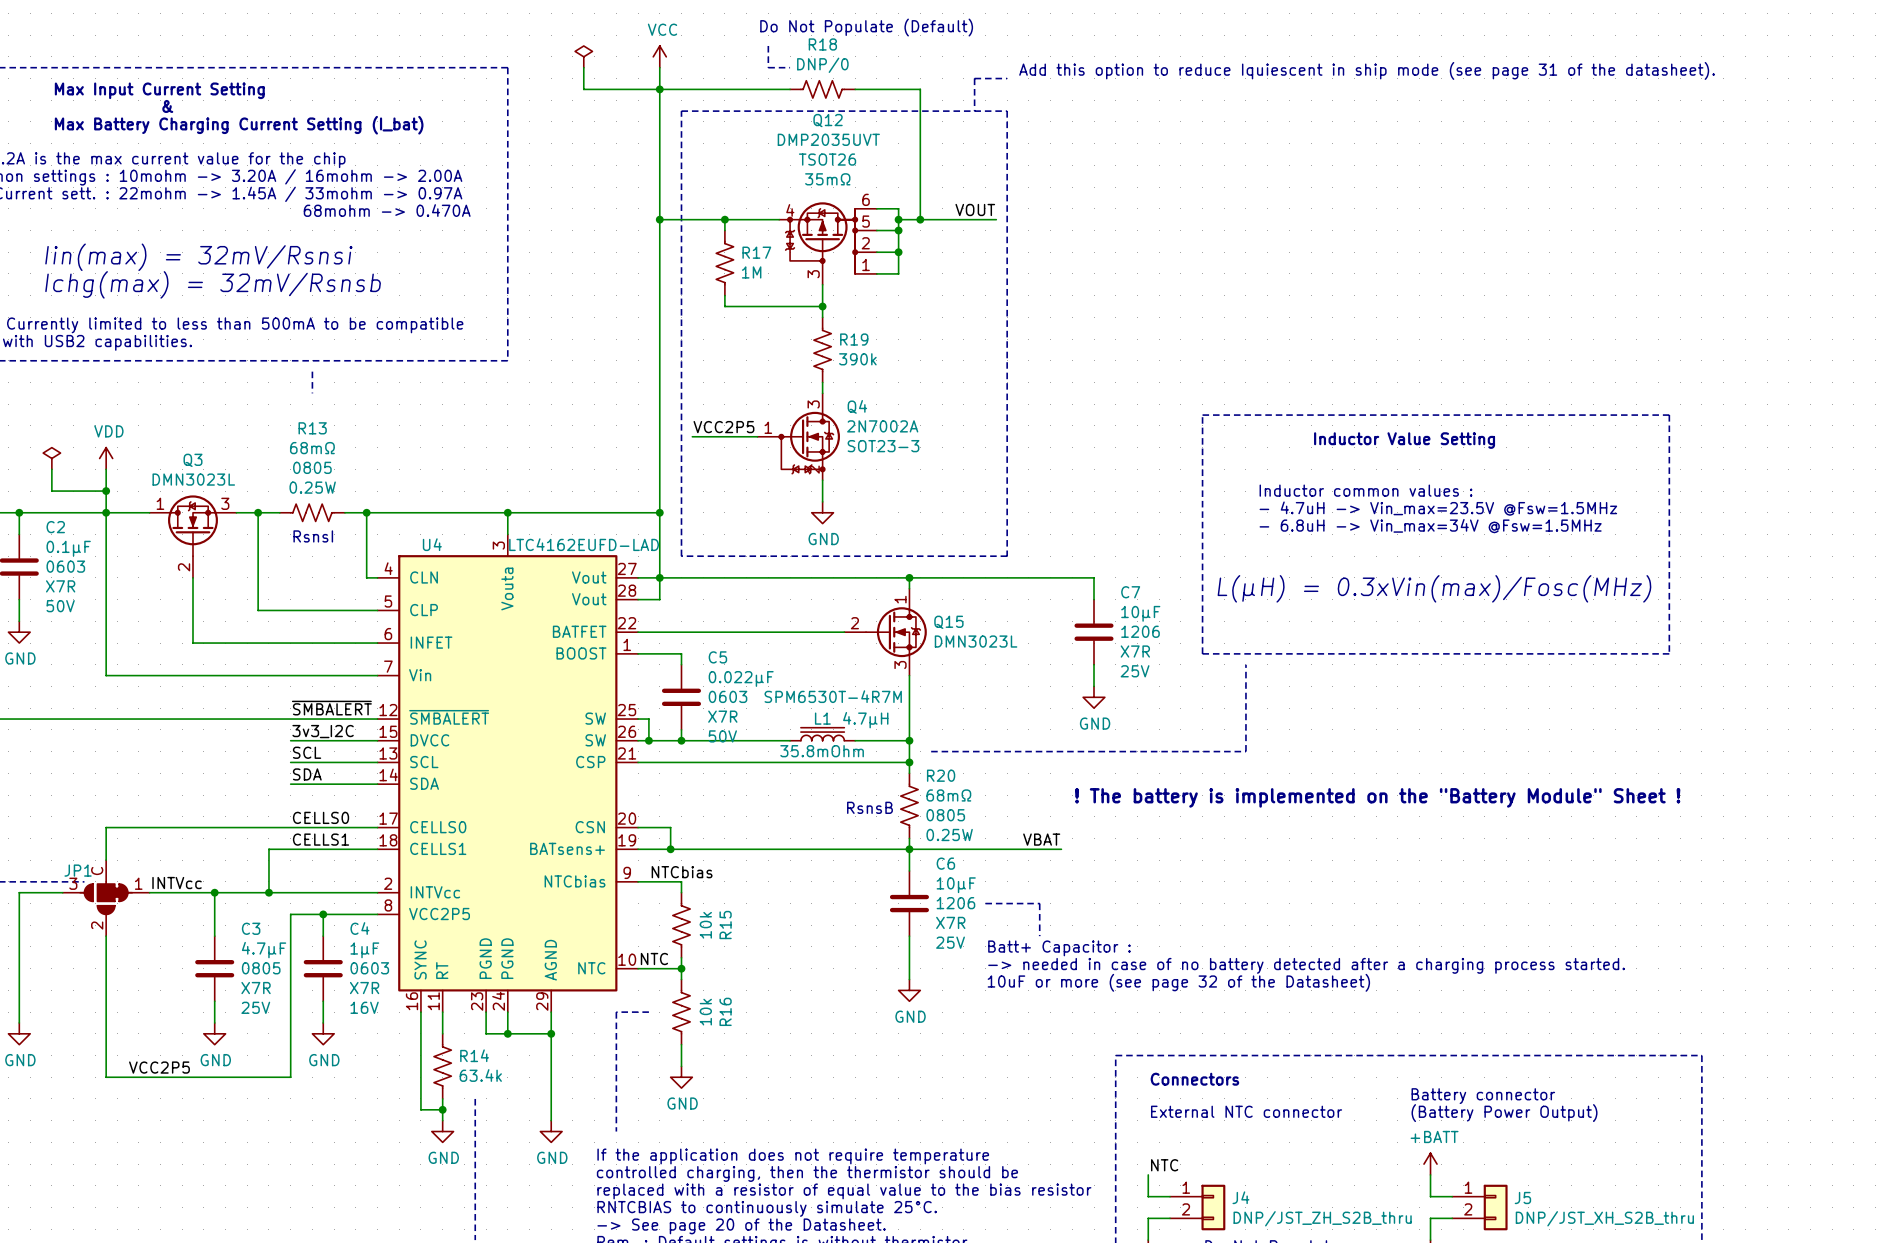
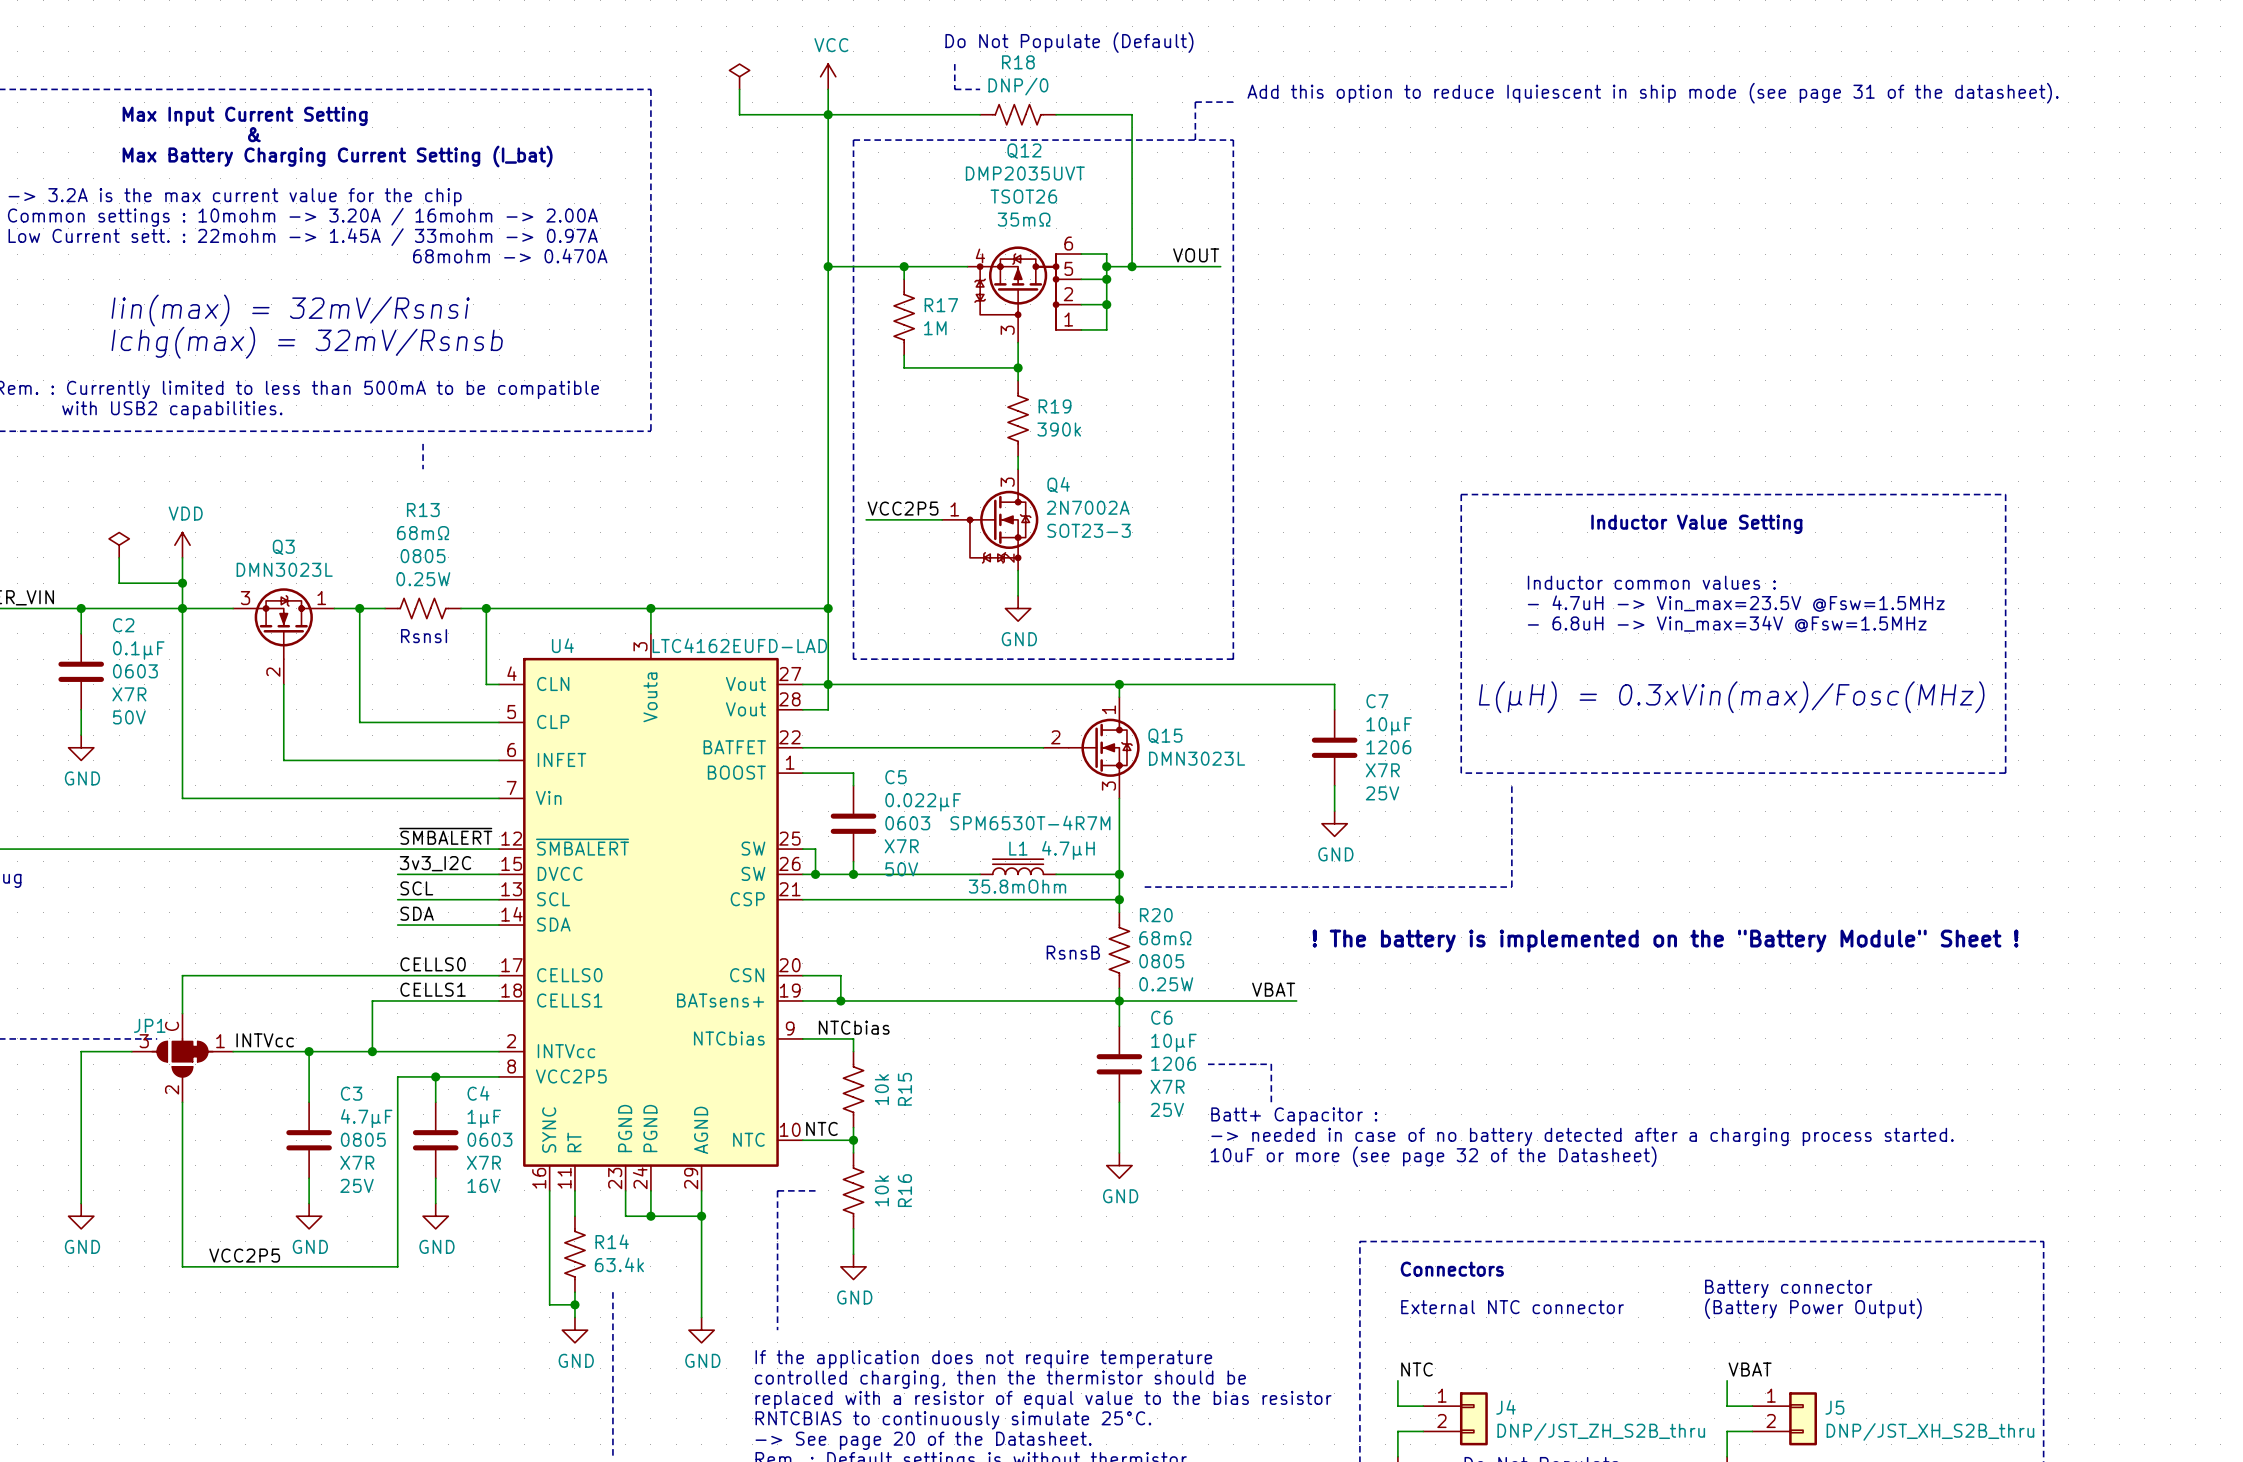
Q3 flip: as is (192, 525) -> left-right (283, 623)
power symbol: +BATT (1430, 1164) -> none
label: none -> VBAT (1750, 1369)

